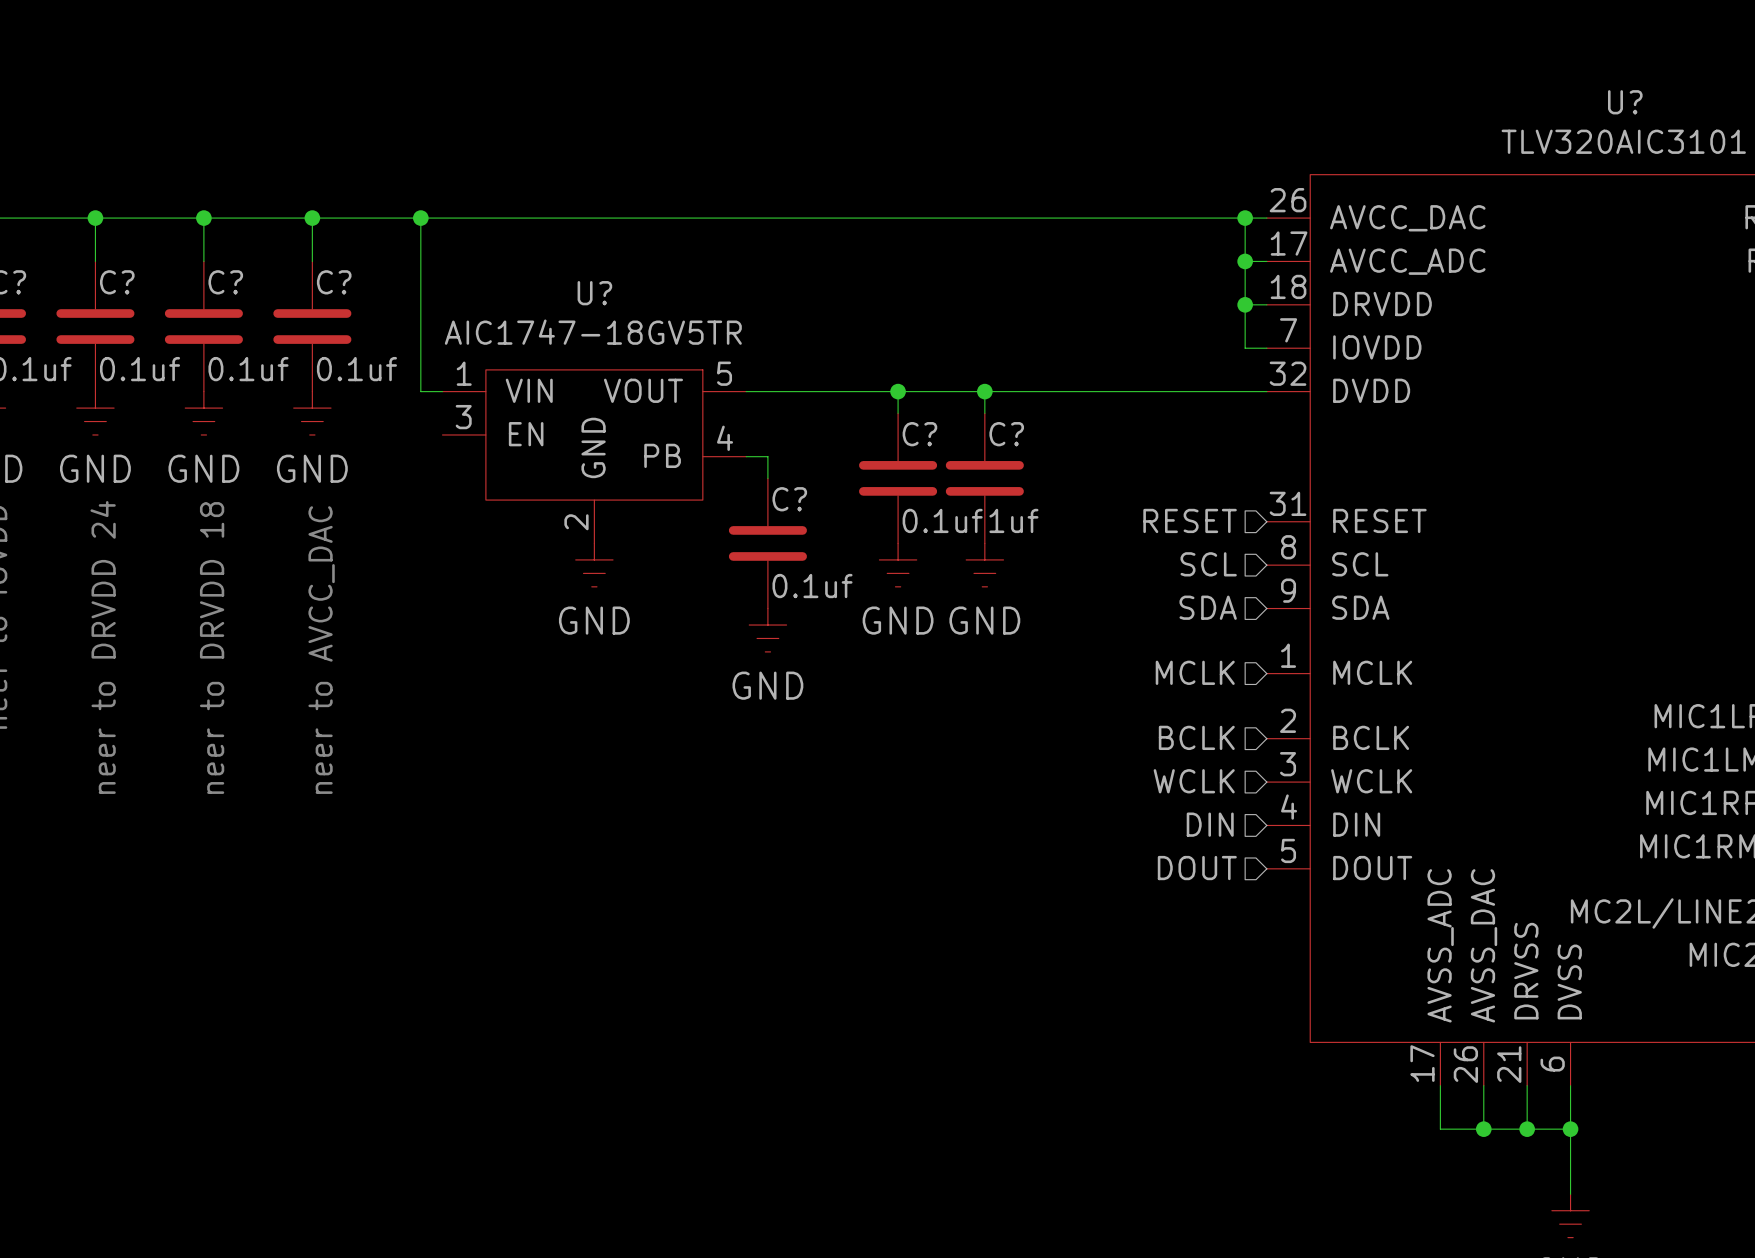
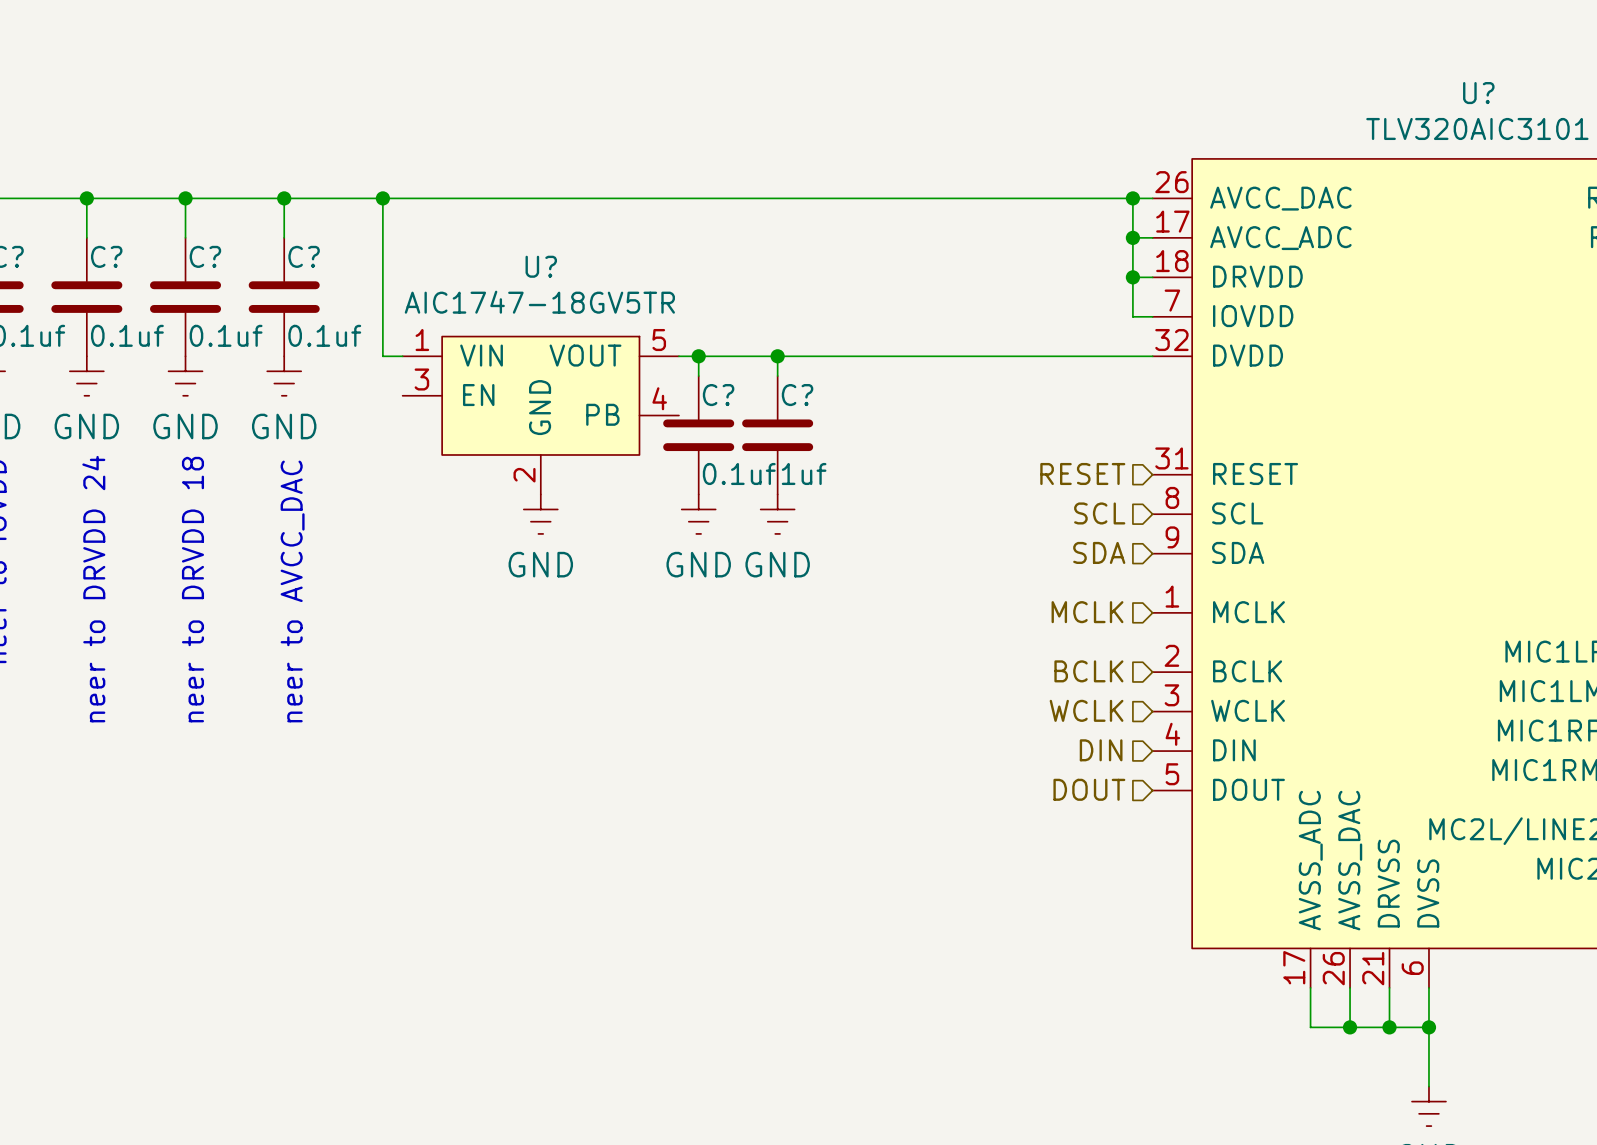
junction: none -> (698, 356)
wire: (898, 391) (898, 413) -> (698, 356) (698, 376)
junction position: (898, 391) -> (777, 356)
wire: (984, 391) (984, 413) -> (777, 356) (777, 376)
junction: (984, 391) -> none
wire: (746, 456) (767, 456) (767, 478) -> none
C?: none -> 0.1uf (698, 435)
C?: 0.1uf (898, 478) -> none
C? position: (984, 478) -> (777, 435)
C?: 0.1uf (767, 543) -> none
power symbol: none -> GND (698, 514)
power symbol position: GND (898, 565) -> GND (777, 514)
power symbol: GND (984, 565) -> none
power symbol: GND (767, 630) -> none

